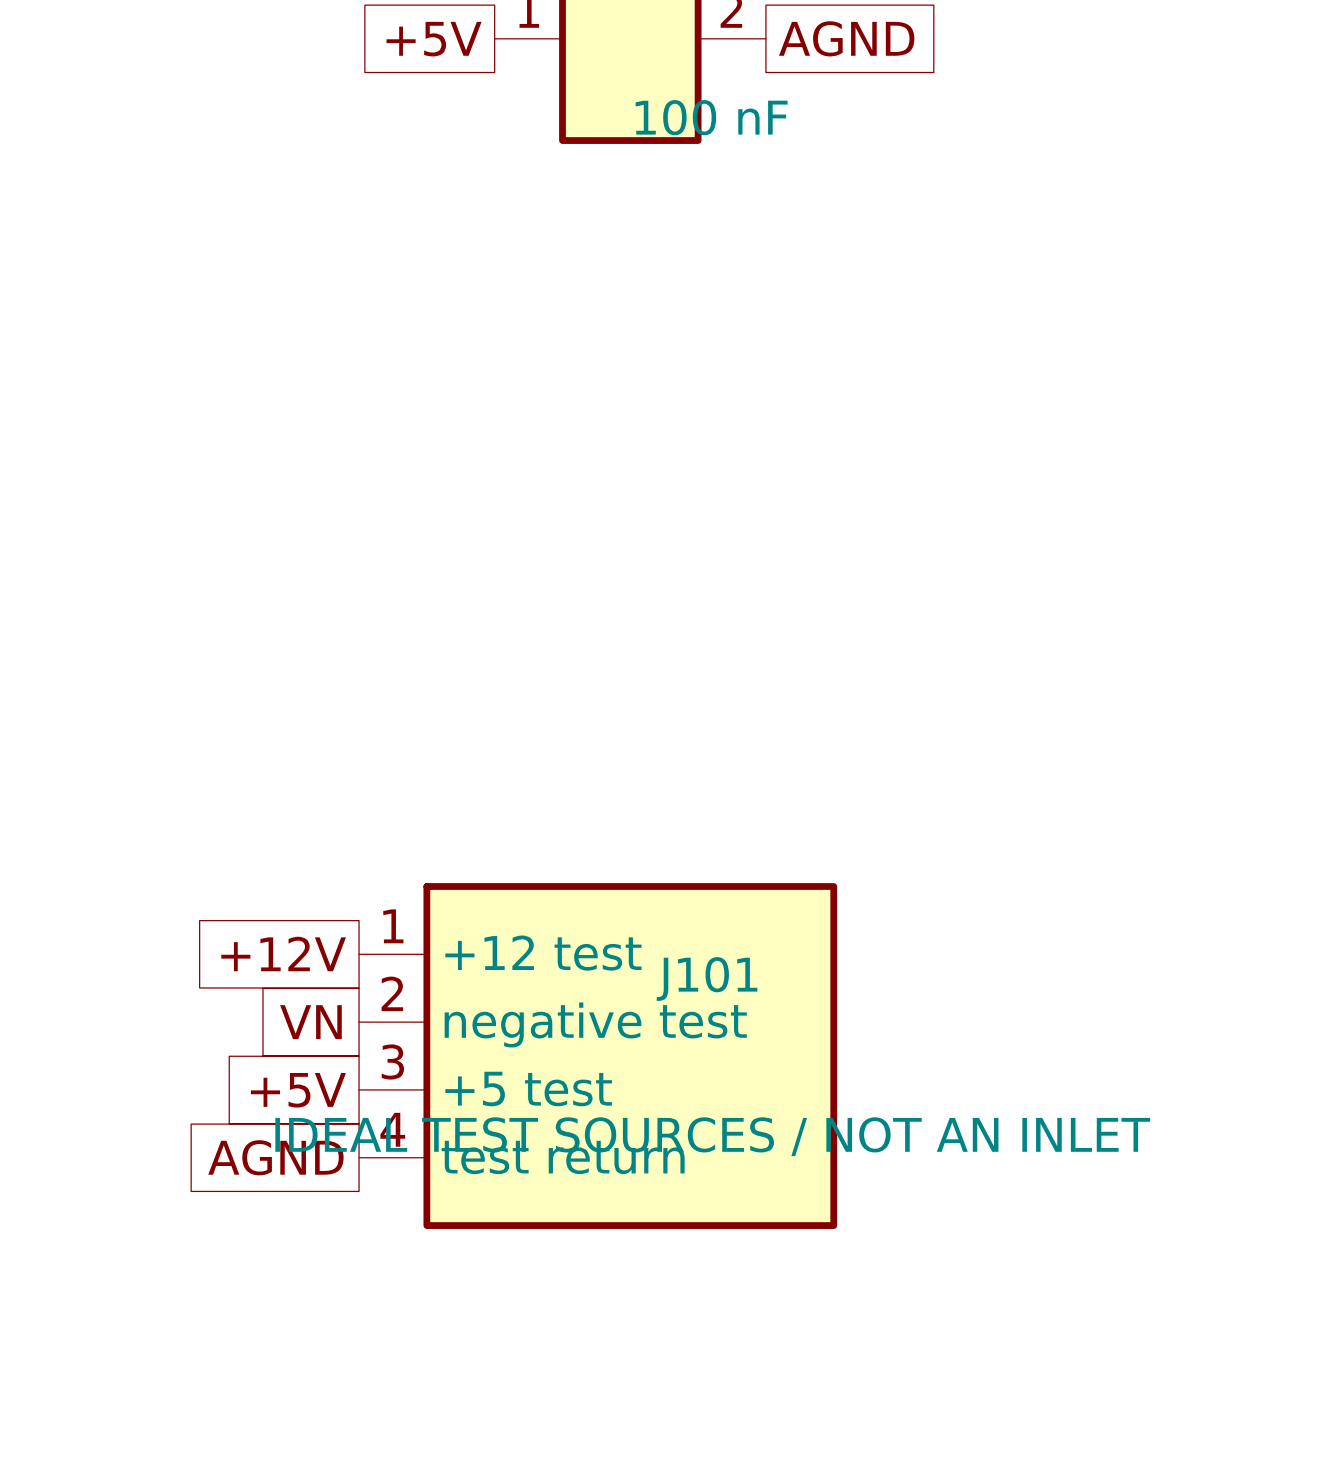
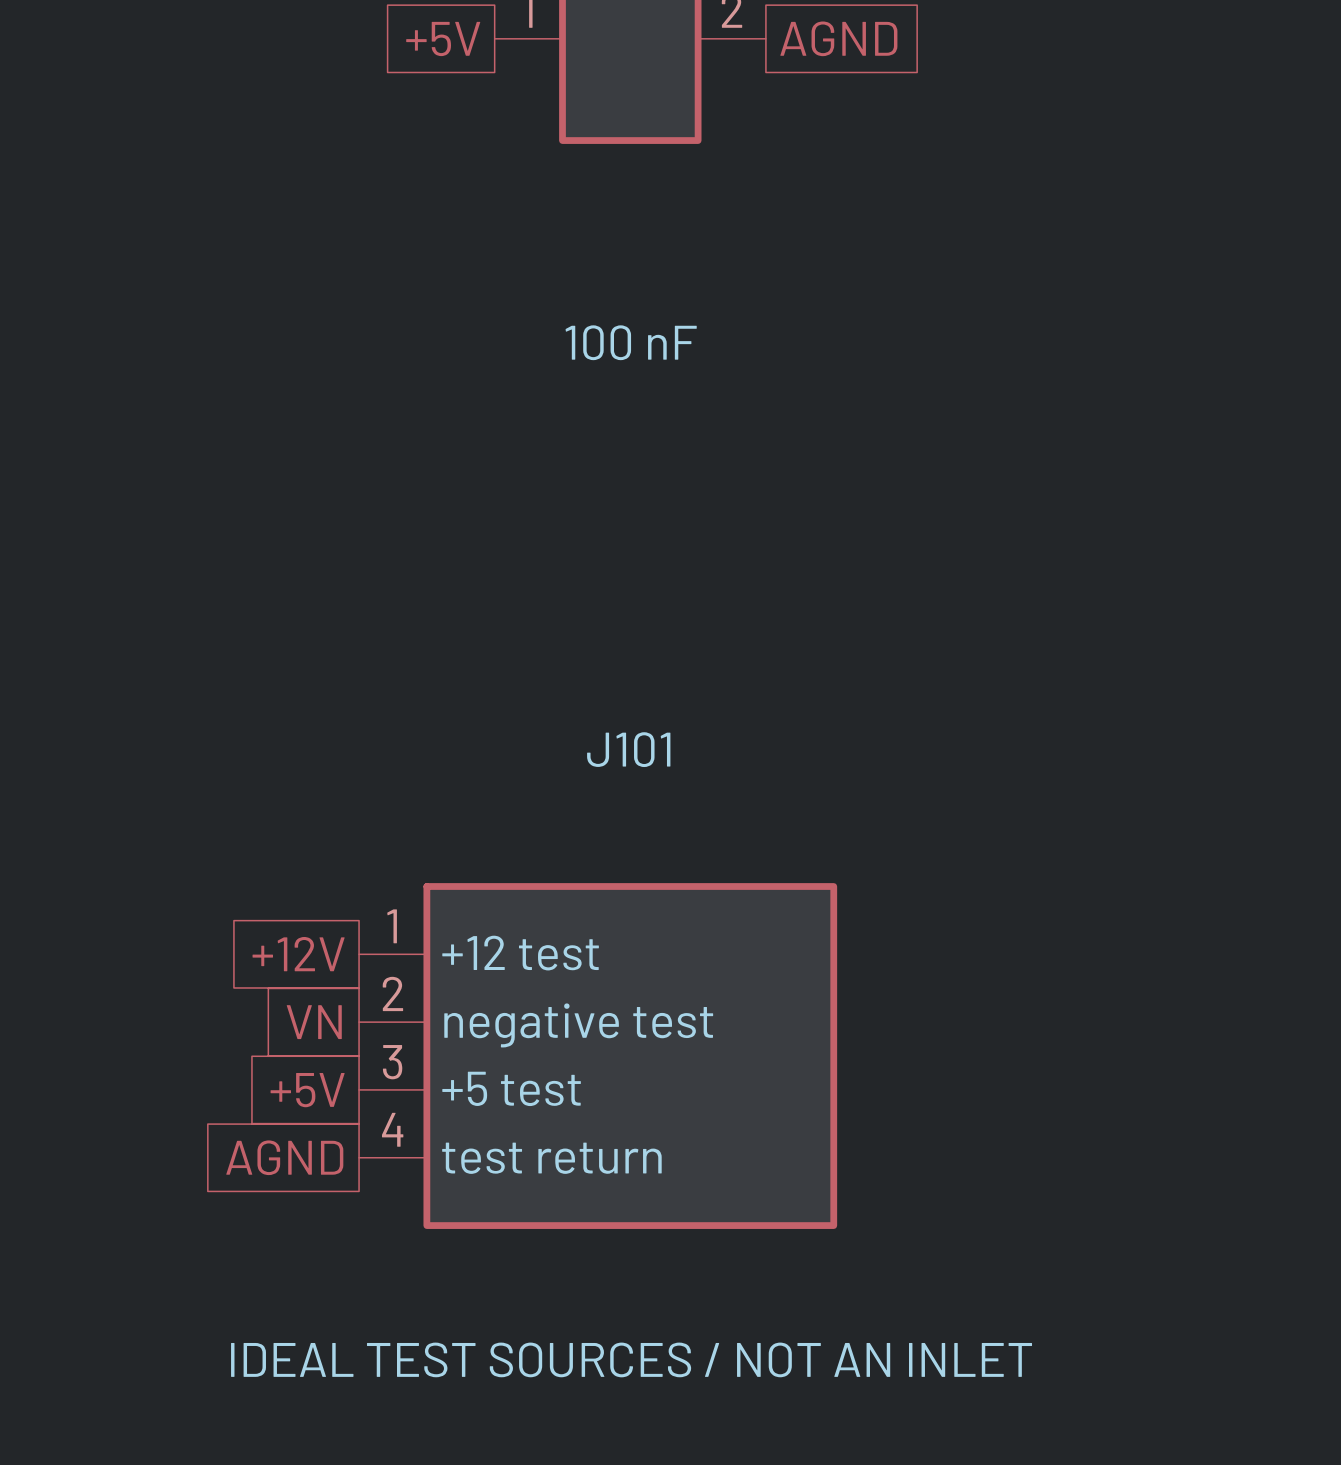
part value position: 100 nF (711, 117) -> 100 nF (631, 342)
J101 name position: J101 (707, 979) -> J101 (628, 749)
J101 value position: IDEAL TEST SOURCES / NOT AN INLET (712, 1136) -> IDEAL TEST SOURCES / NOT AN INLET (631, 1359)

